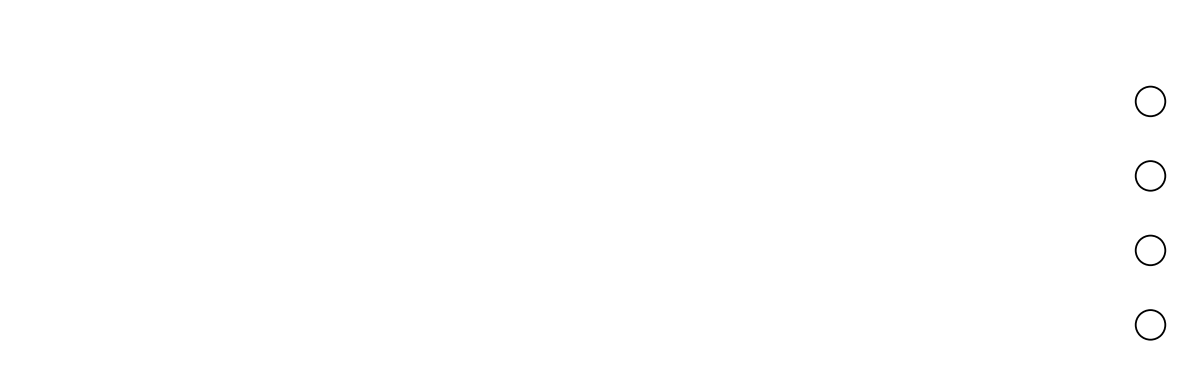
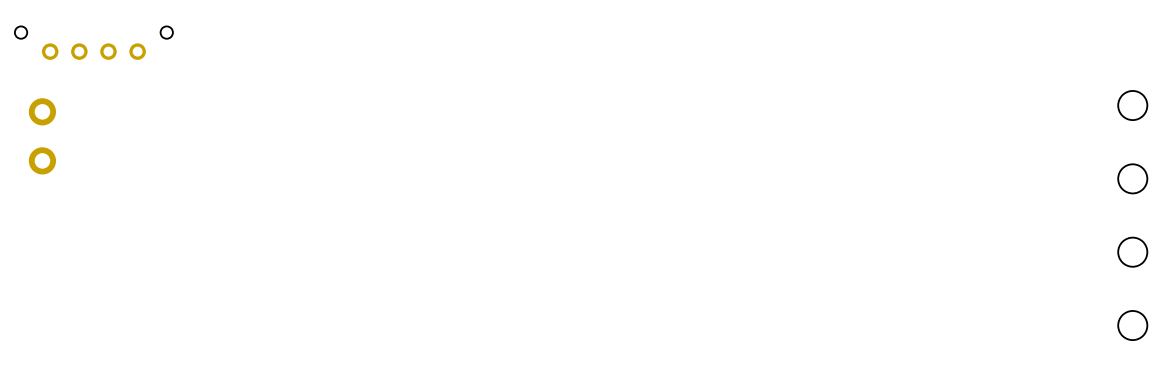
part: none -> (93, 43)
part: none -> (42, 111)
part: none -> (42, 160)

